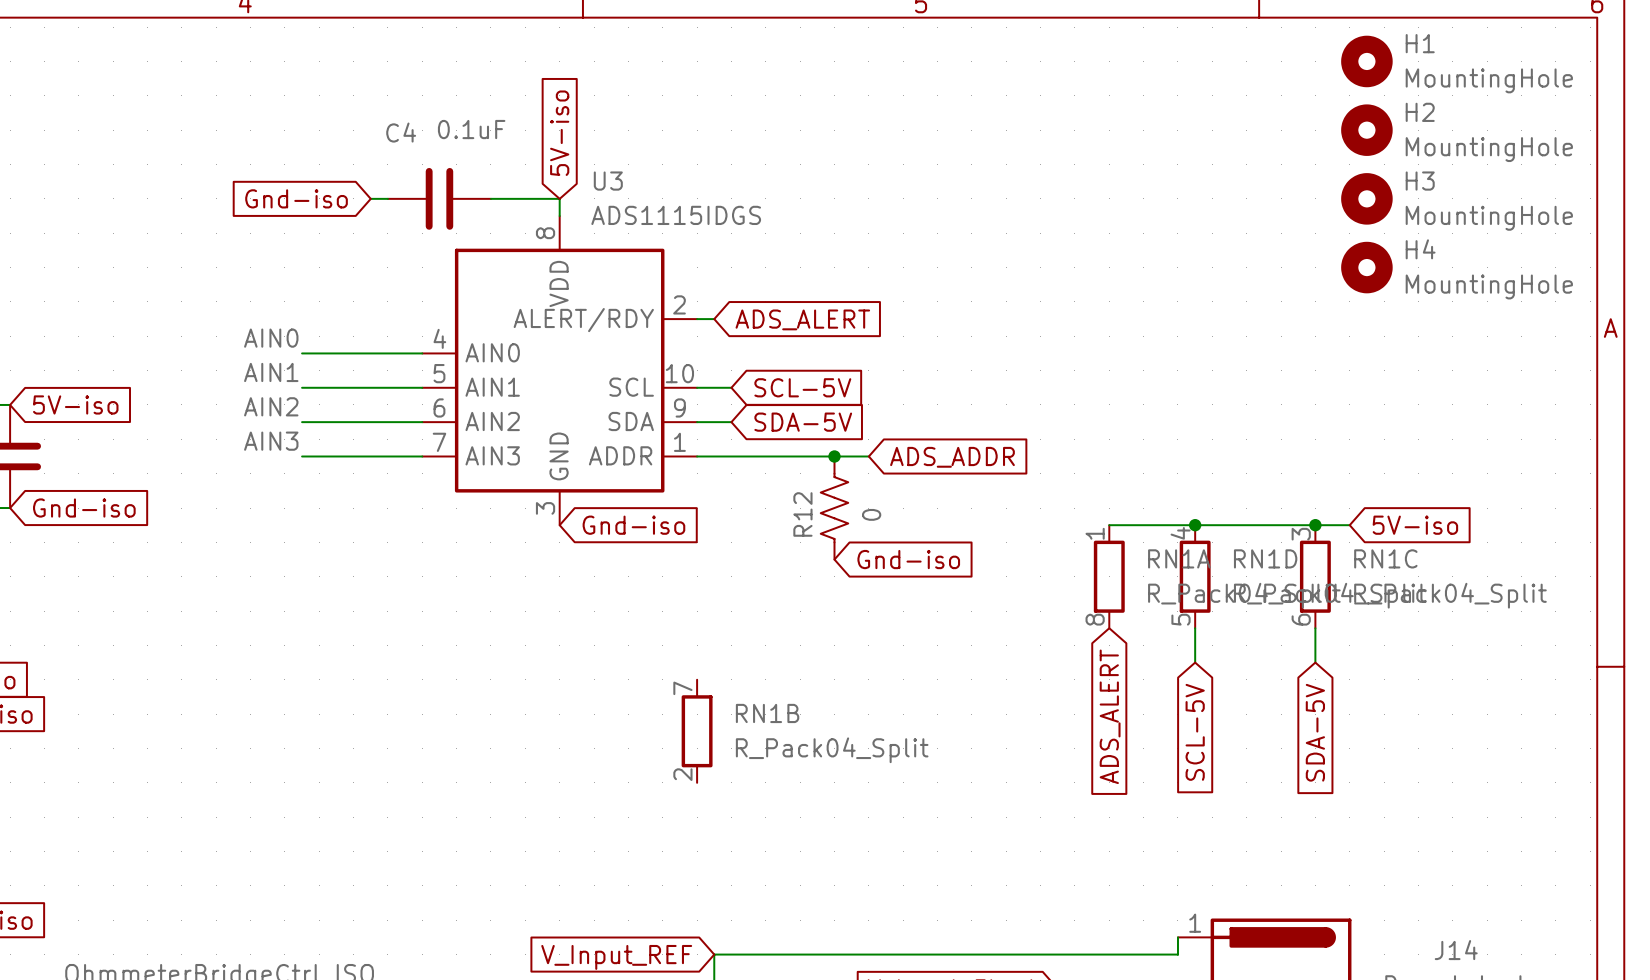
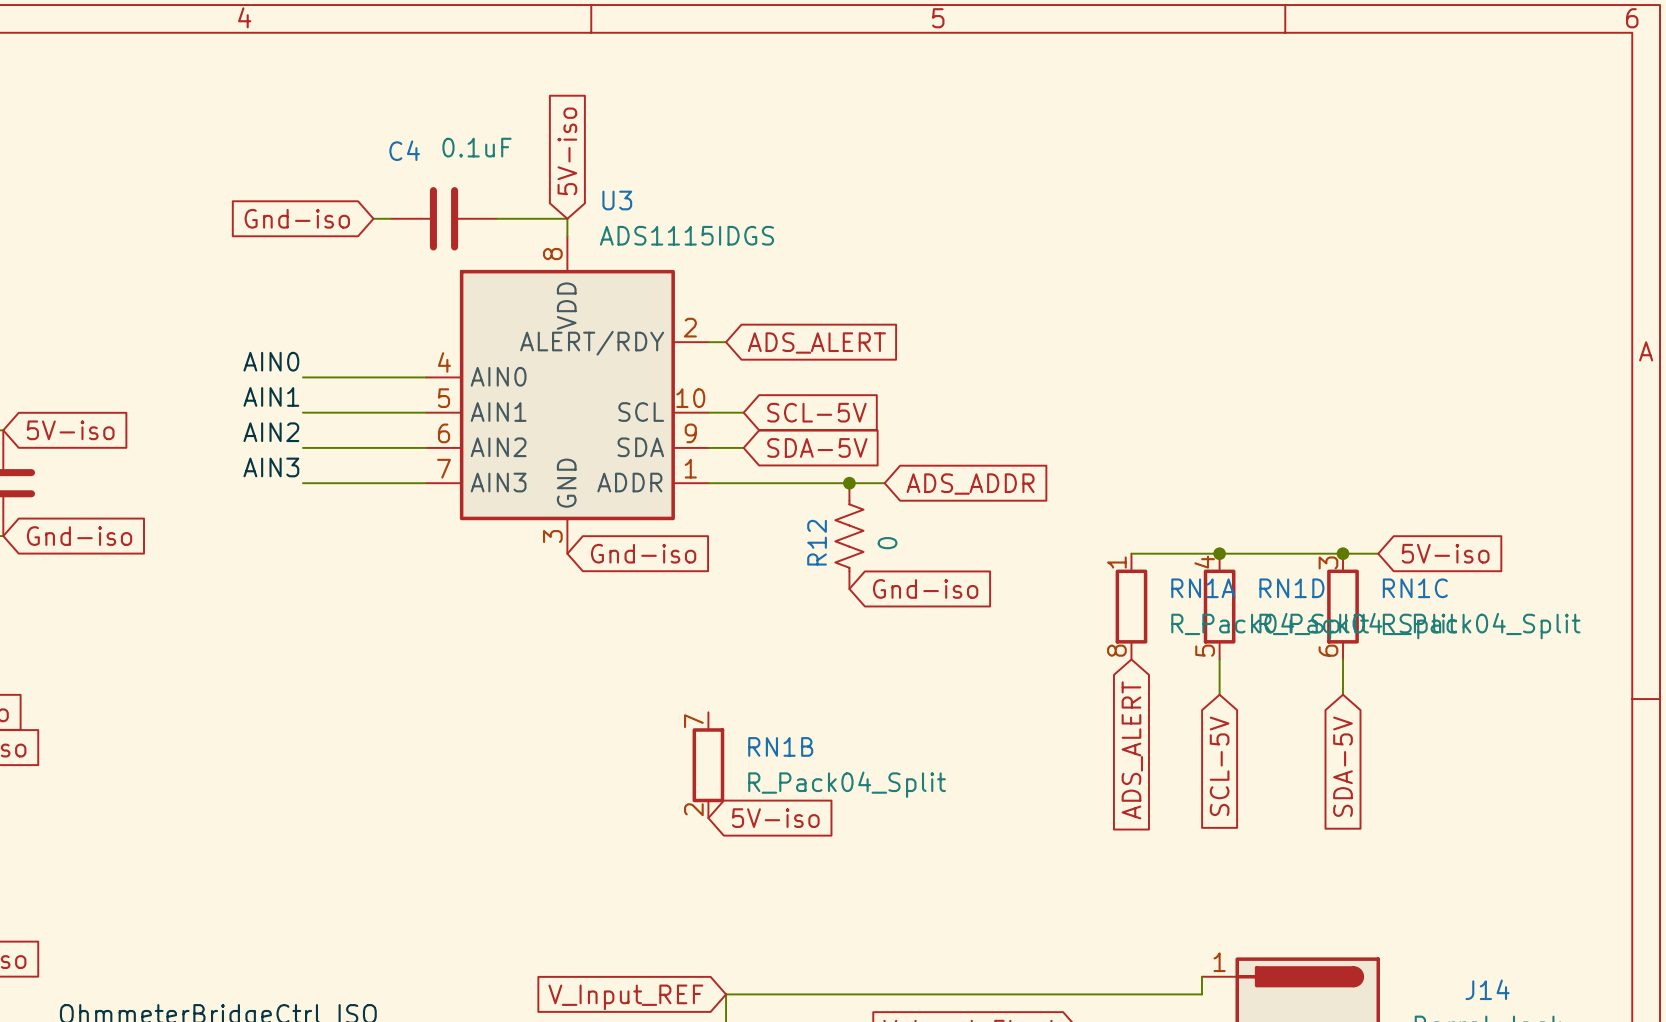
H1: MountingHole (1366, 61) -> none
H2: MountingHole (1366, 130) -> none
H3: MountingHole (1366, 198) -> none
H4: MountingHole (1366, 267) -> none
global label: none -> 5V-iso (775, 818)

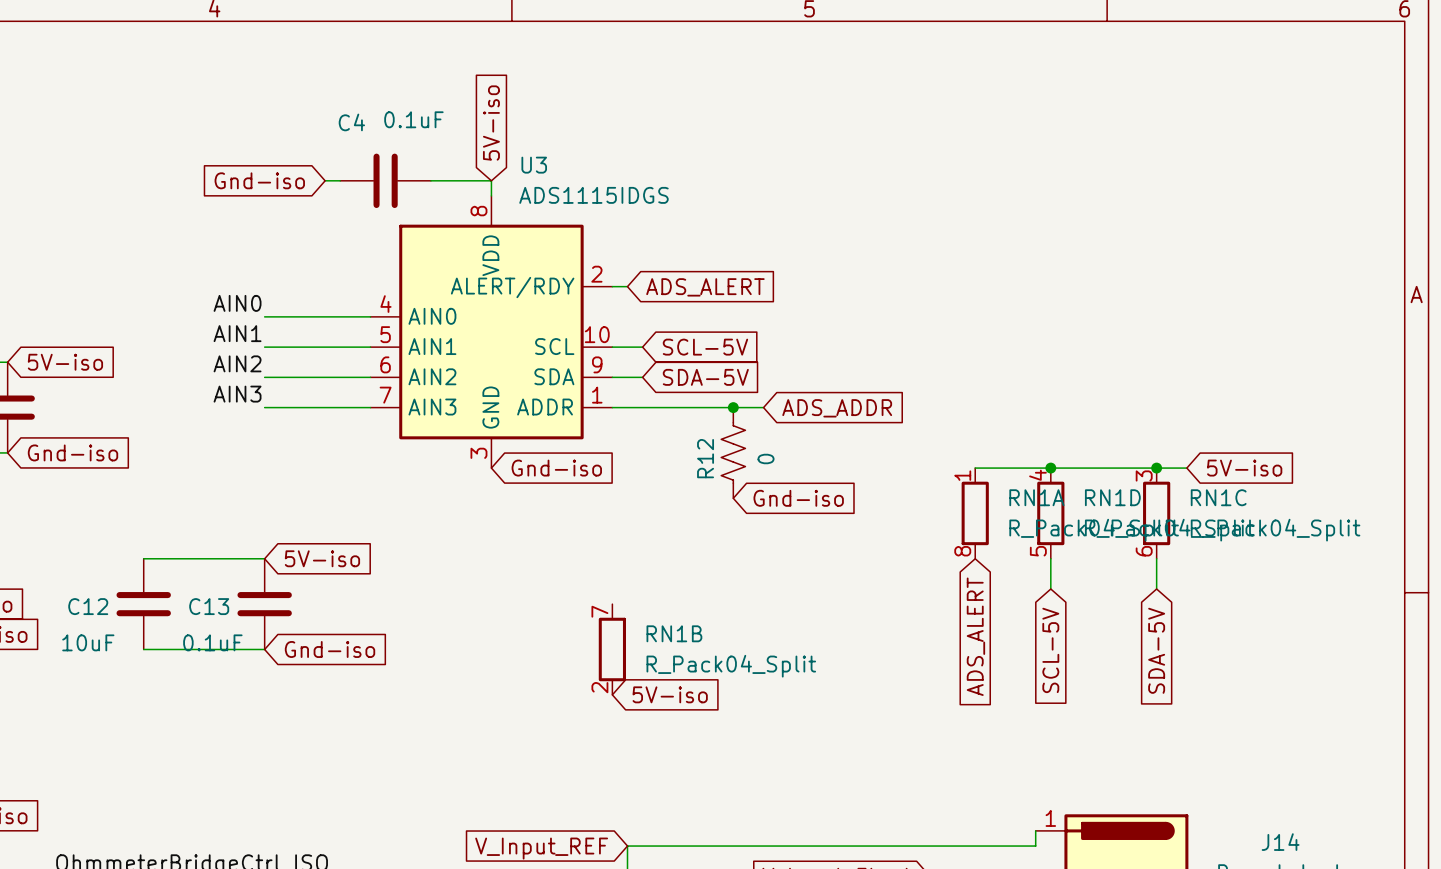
wire: none -> (143, 558) (264, 558)
global label: none -> 5V-iso (322, 558)
C12: none -> 10uF (143, 604)
C13: none -> 0.1uF (264, 604)
wire: none -> (143, 649) (264, 649)
global label: none -> Gnd-iso (330, 649)

